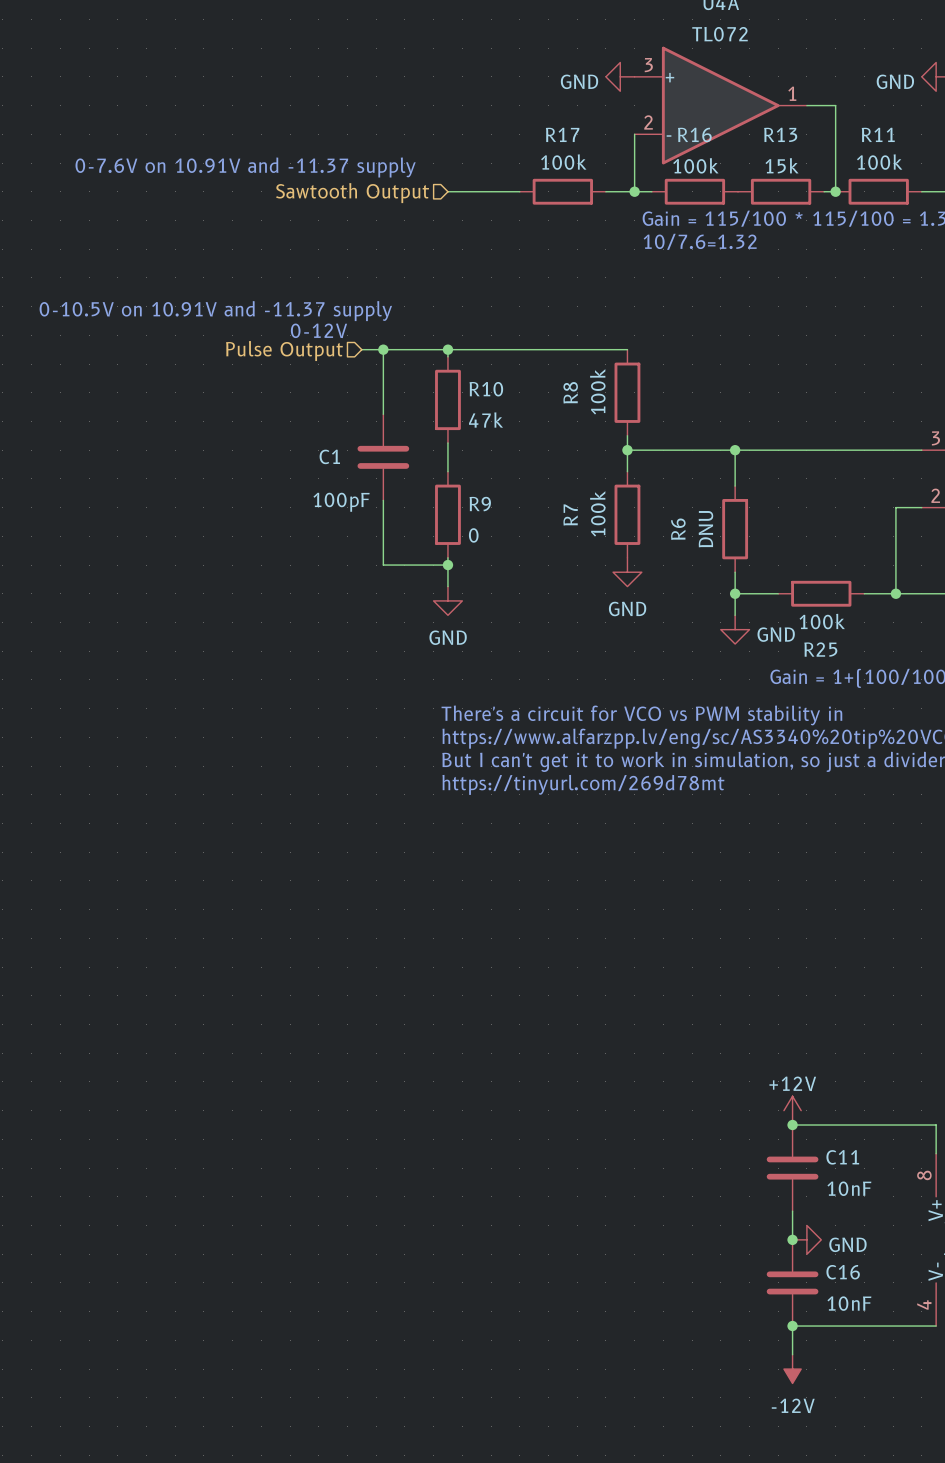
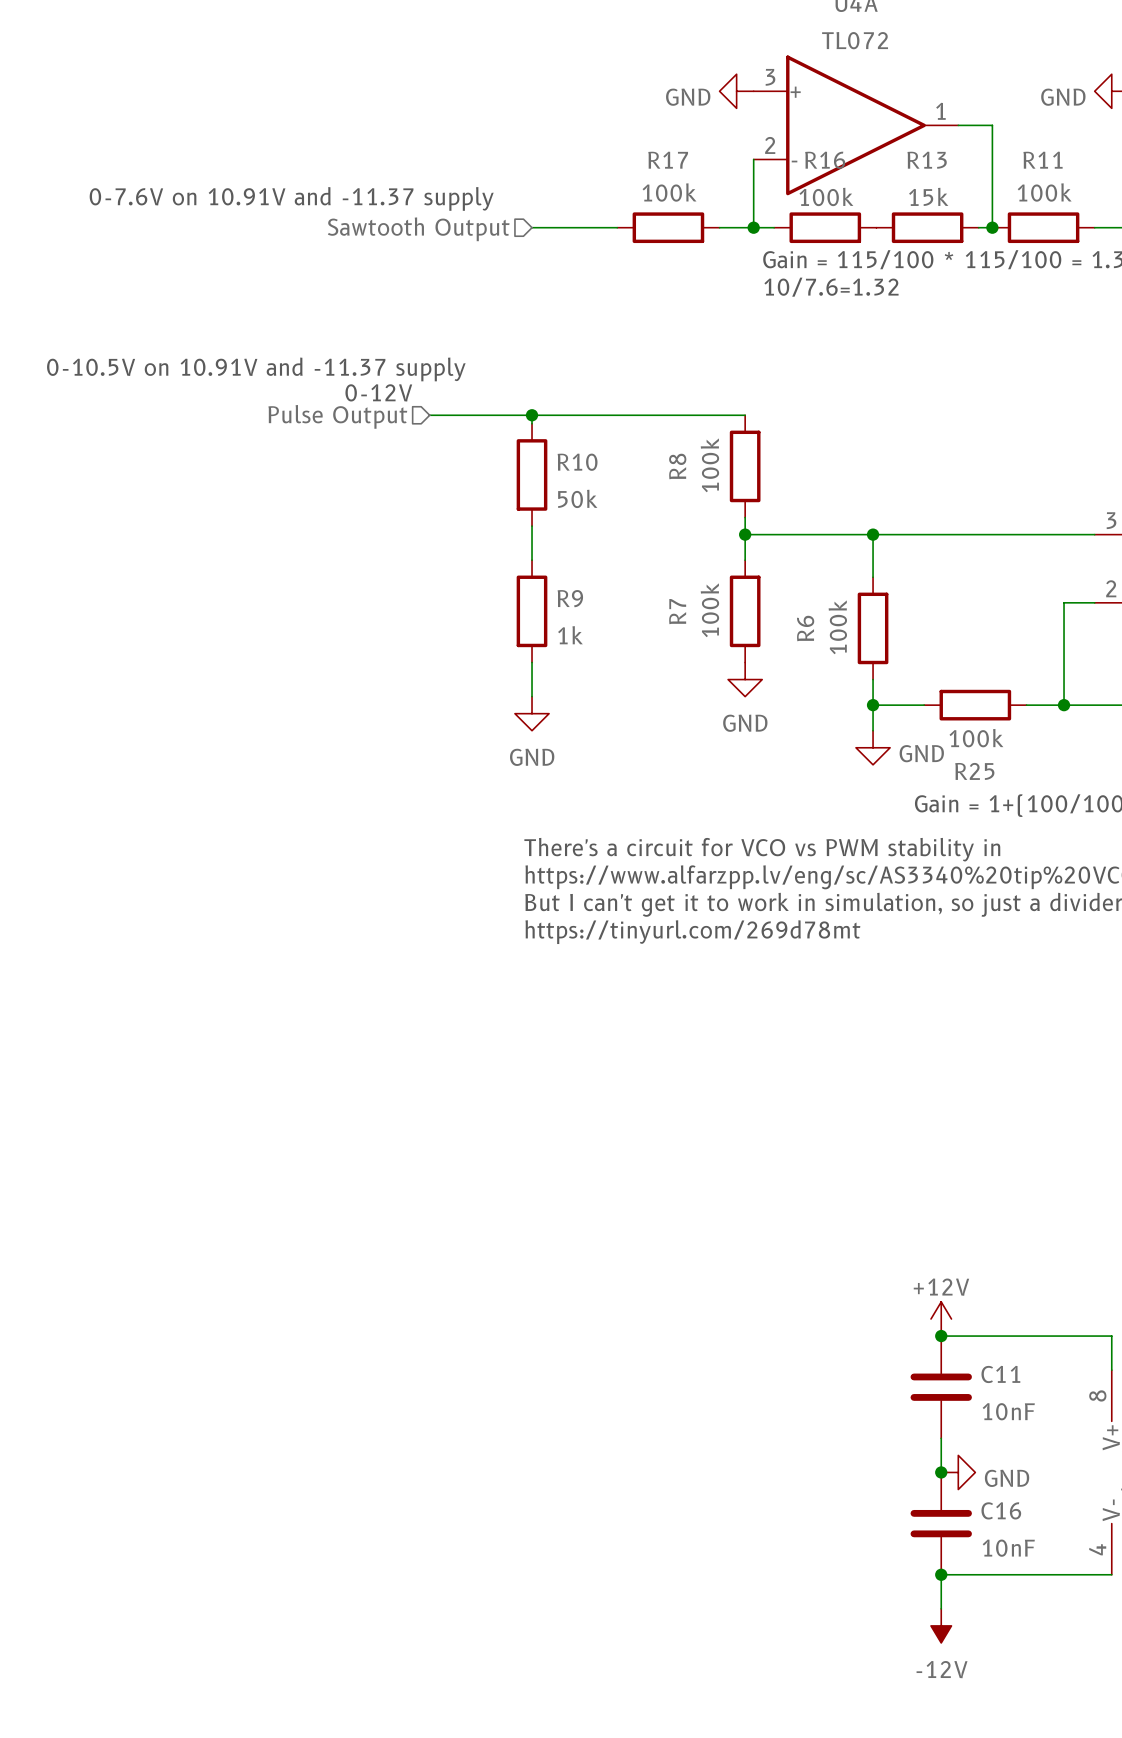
wire: (383, 349) (383, 414) -> none
junction: (383, 349) -> none
R10 value: 47k (486, 420) -> 50k (577, 498)
C1: 100pF (383, 457) -> none
wire: (383, 500) (383, 565) (447, 565) -> none
R6 value: DNU (705, 529) -> 100k (837, 627)
R9 value: 0 (473, 535) -> 1k (570, 635)
junction: (447, 565) -> none

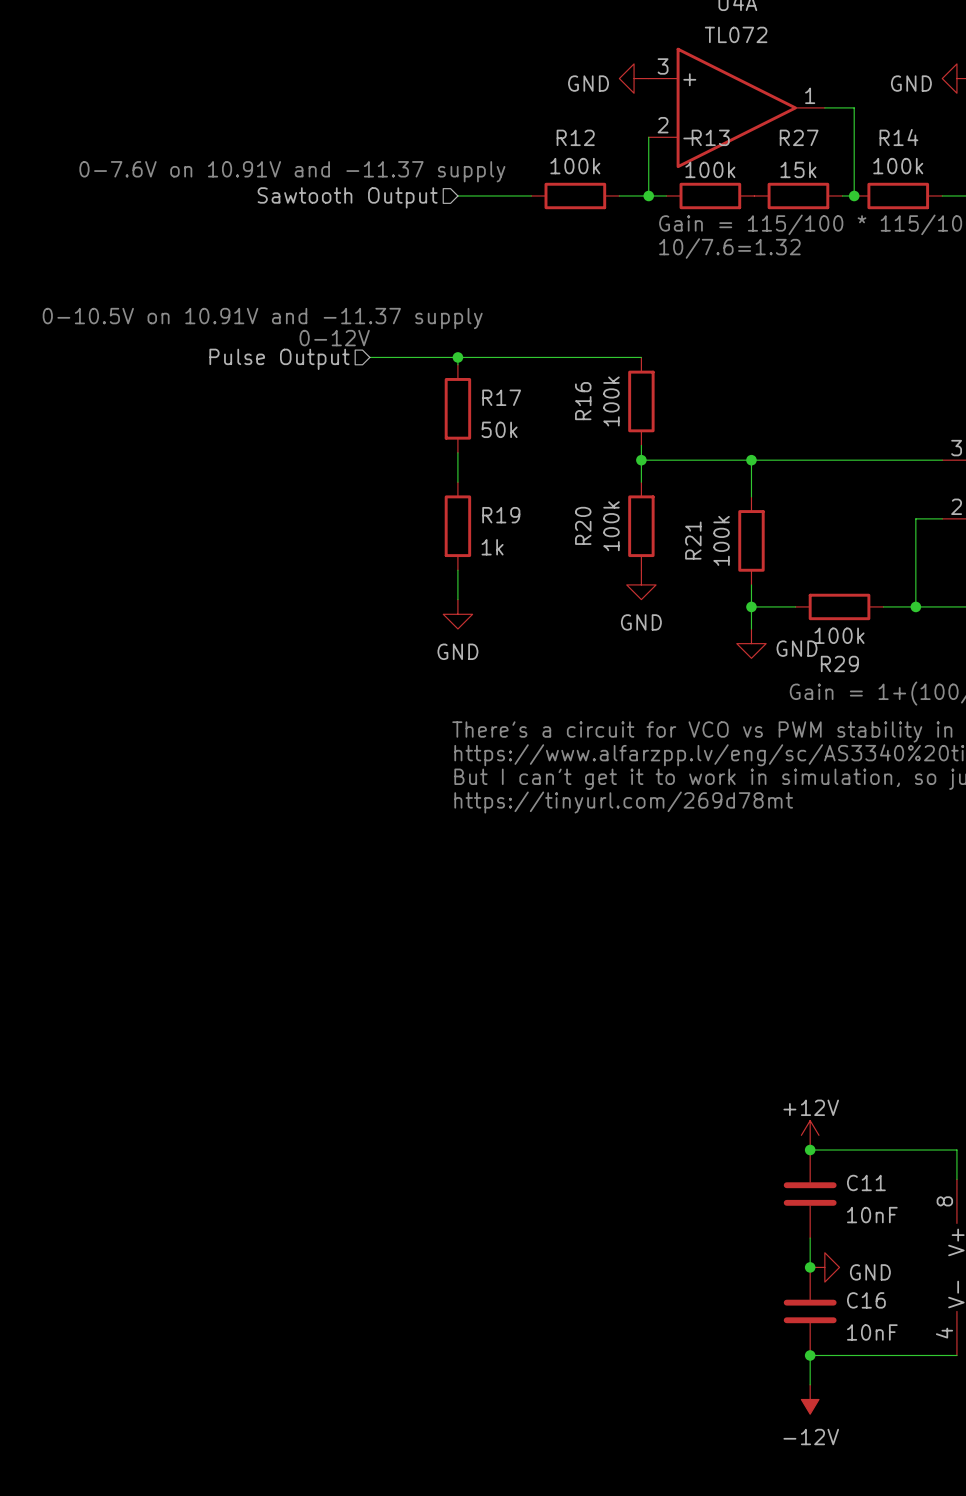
R17 name: R17 (668, 160) -> R12 (575, 137)
R16 name: R16 (825, 160) -> R13 (710, 137)
R13 name: R13 (927, 160) -> R27 (799, 137)
R11 name: R11 (1043, 160) -> R14 (898, 137)
R10 name: R10 (577, 462) -> R17 (501, 397)
R8 name: R8 (677, 466) -> R16 (583, 401)
R9 name: R9 (570, 598) -> R19 (501, 515)
R7 name: R7 (677, 611) -> R20 (583, 525)
R6 name: R6 (805, 628) -> R21 (693, 540)
R25 name: R25 (974, 771) -> R29 (839, 663)

